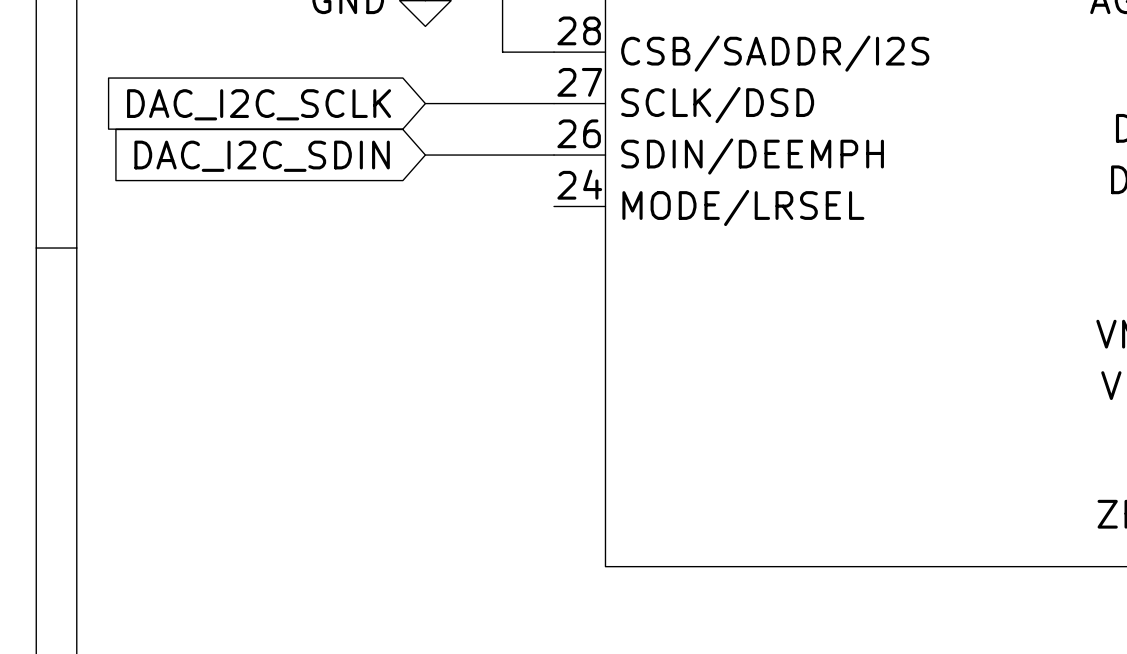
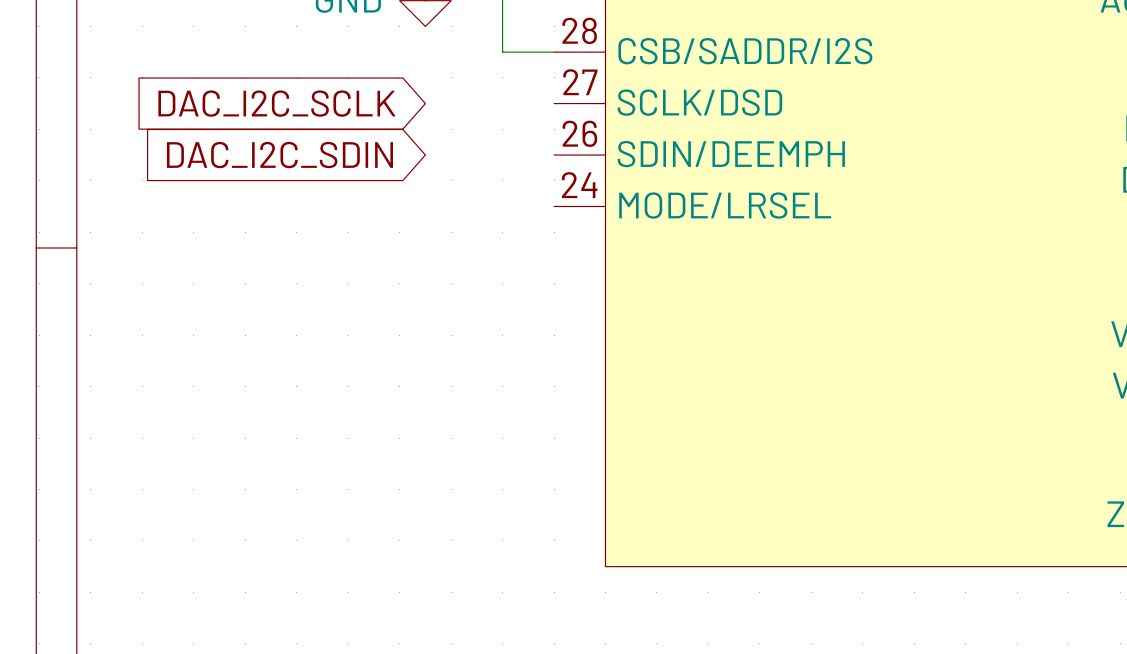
wire: (425, 103) (554, 103) -> none
wire: (425, 155) (554, 155) -> none

